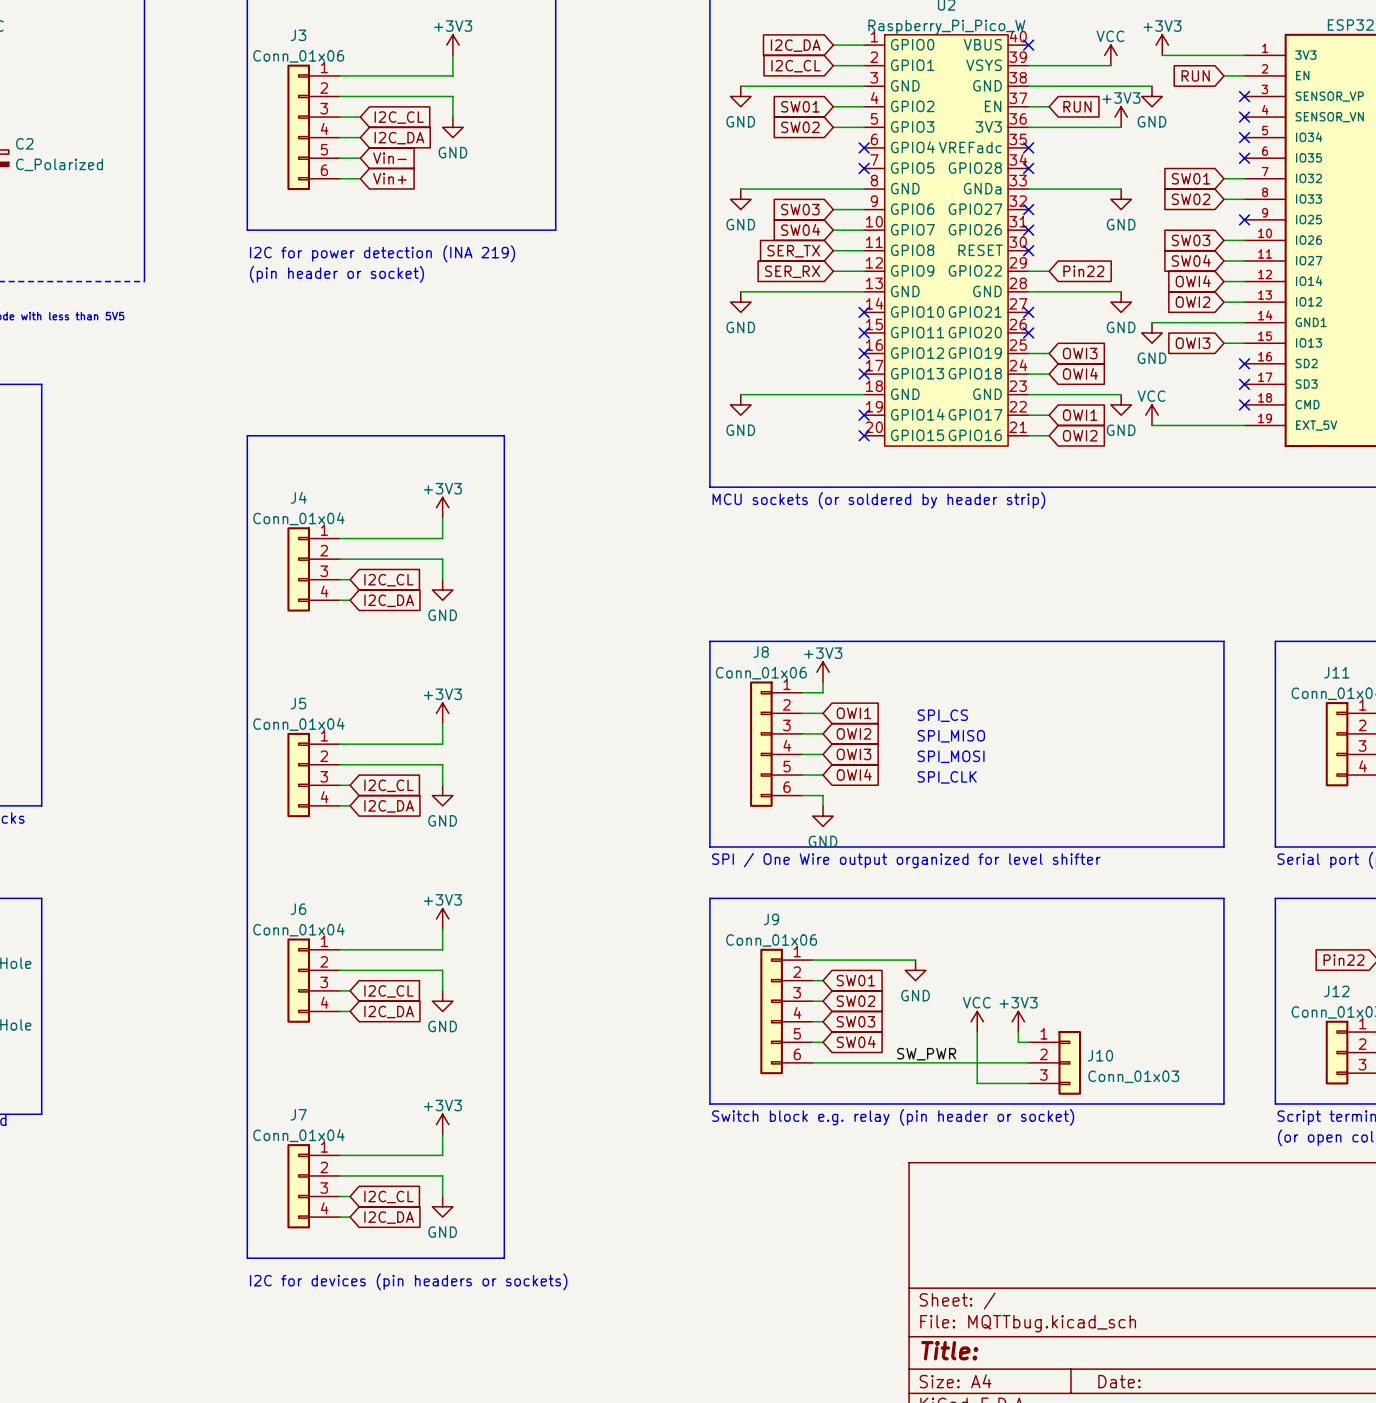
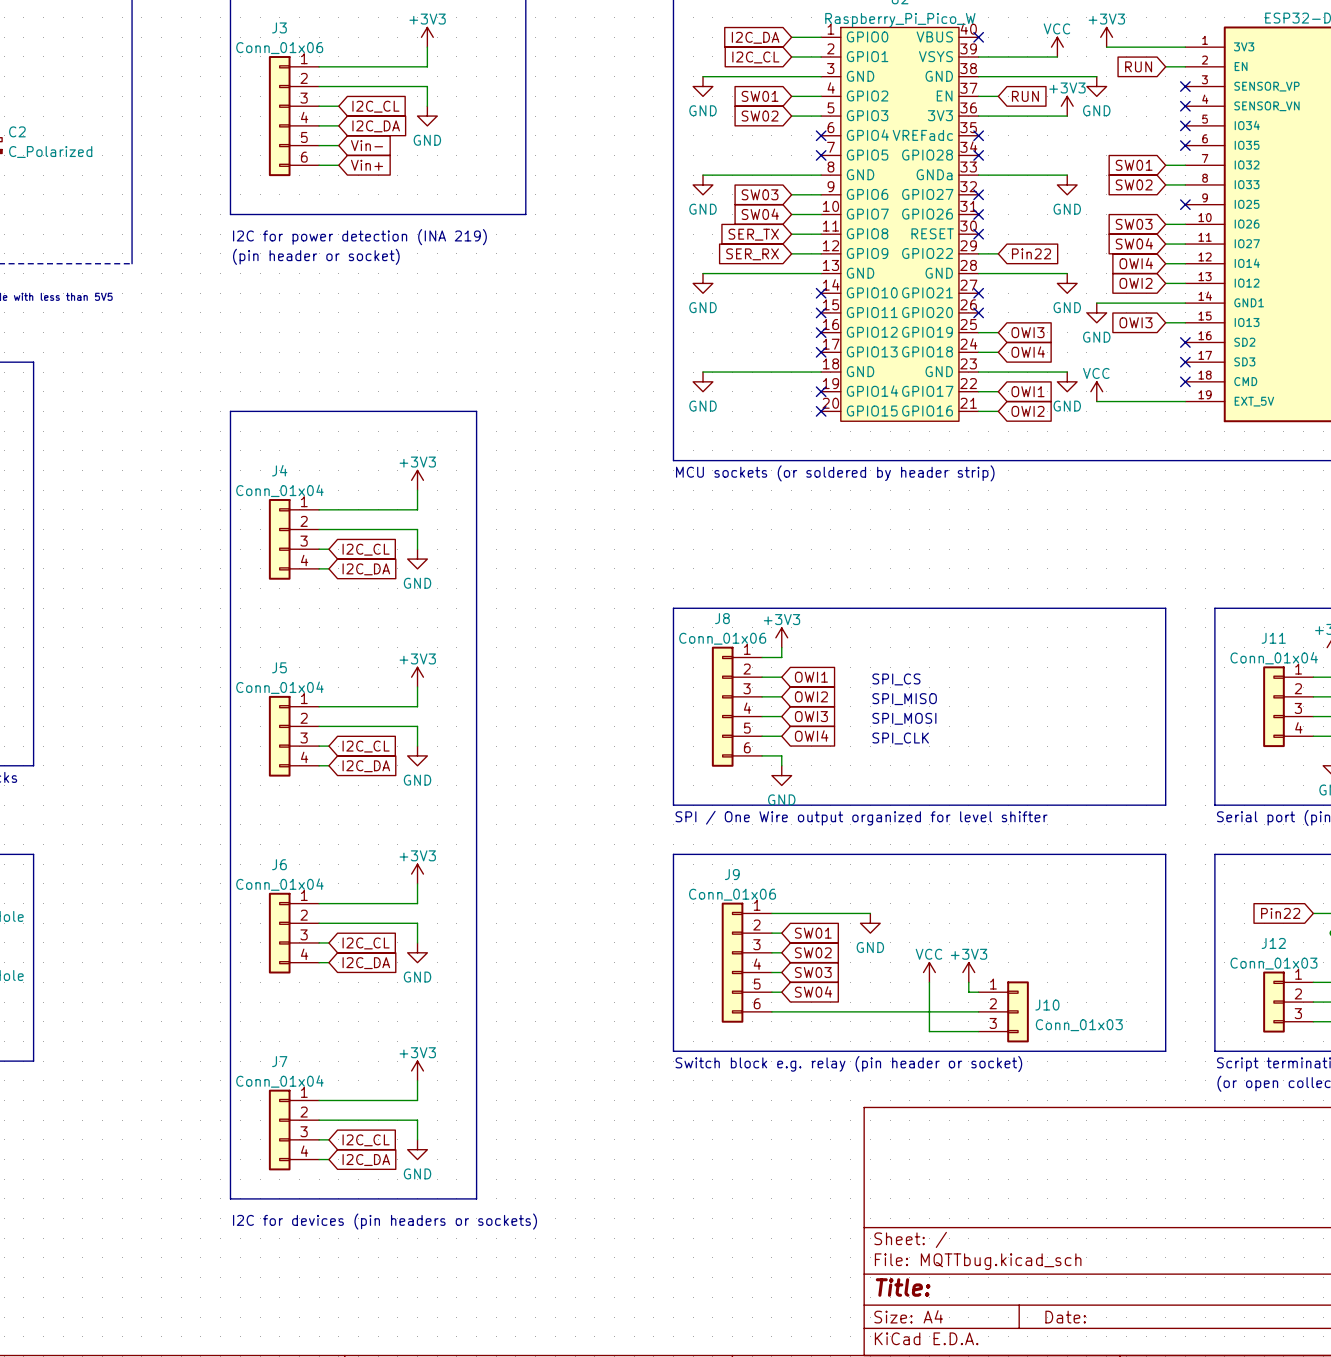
label: SW_PWR (926, 1054) -> none

